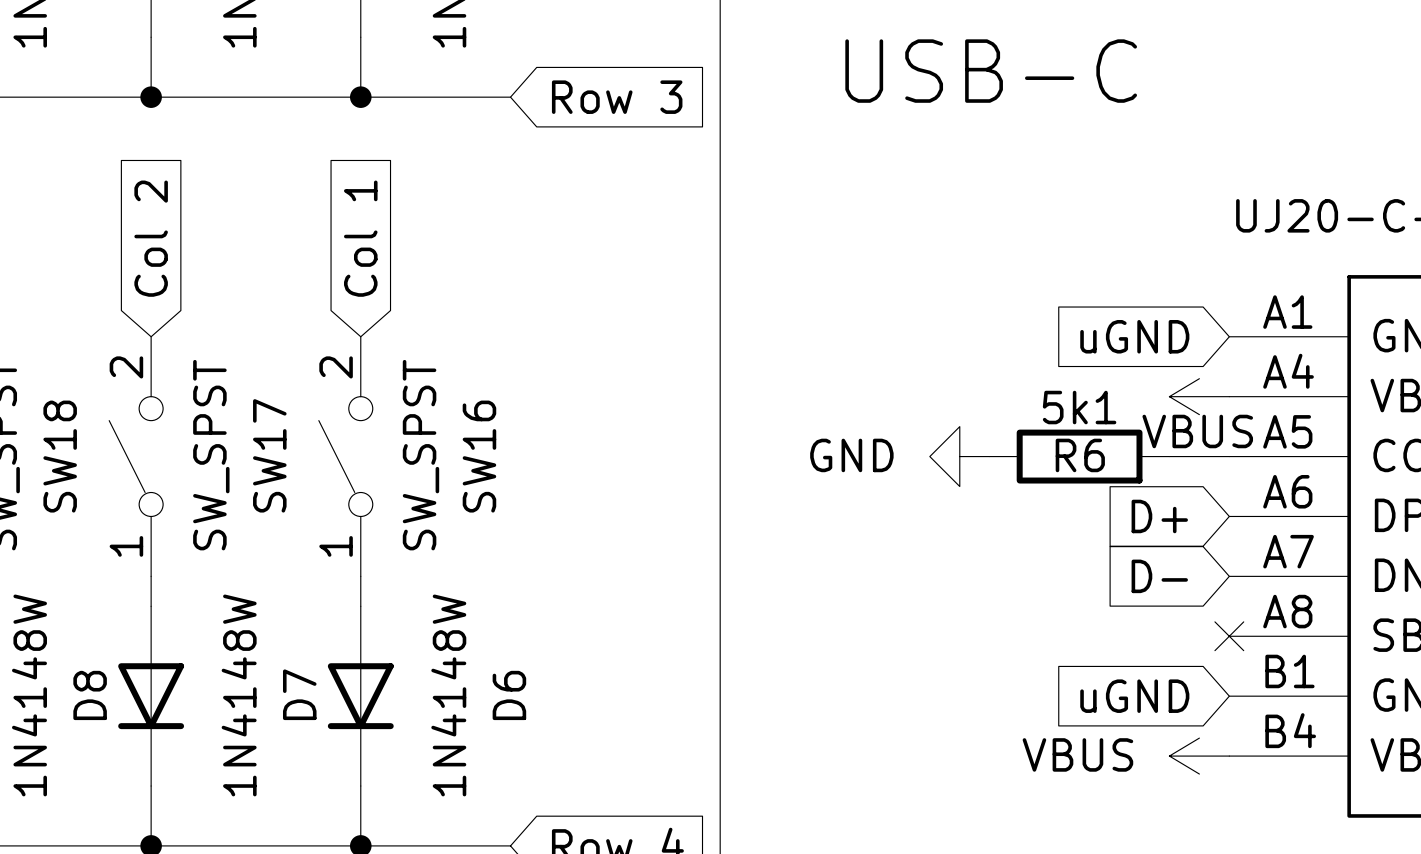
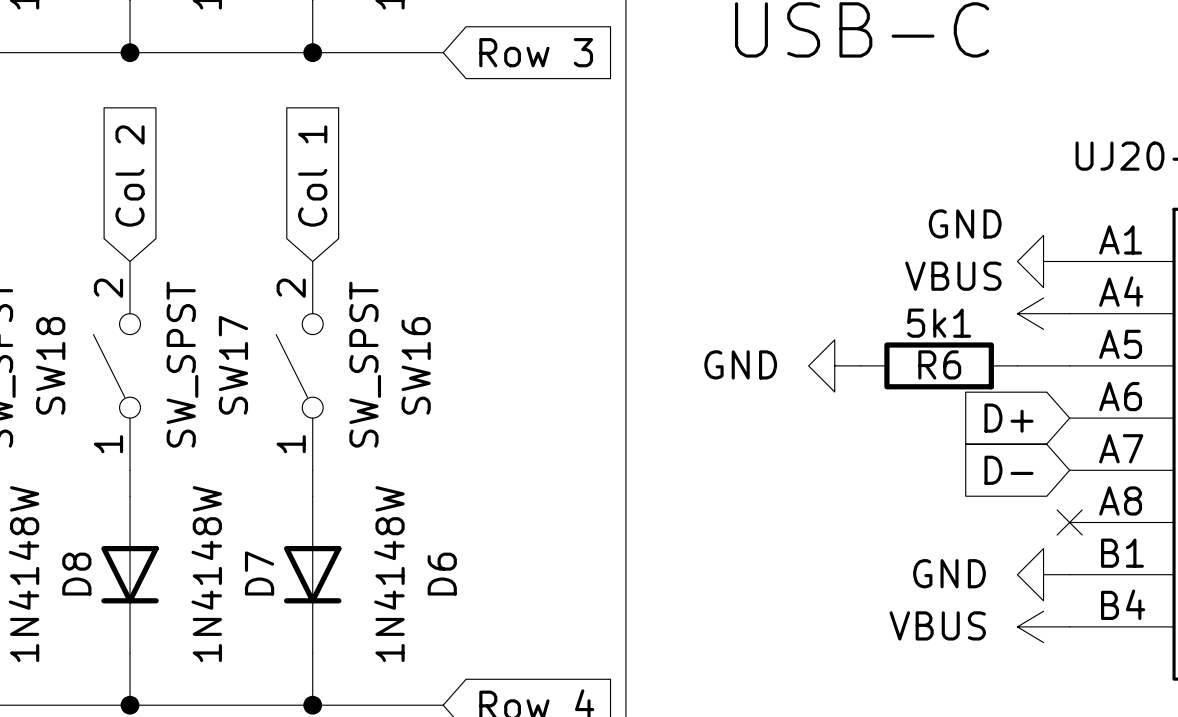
global label: uGND (1134, 336) -> none
power symbol: none -> GND (1043, 261)
power symbol text position: VBUS (1197, 431) -> VBUS (953, 276)
global label: uGND (1134, 696) -> none
power symbol: none -> GND (1043, 574)

